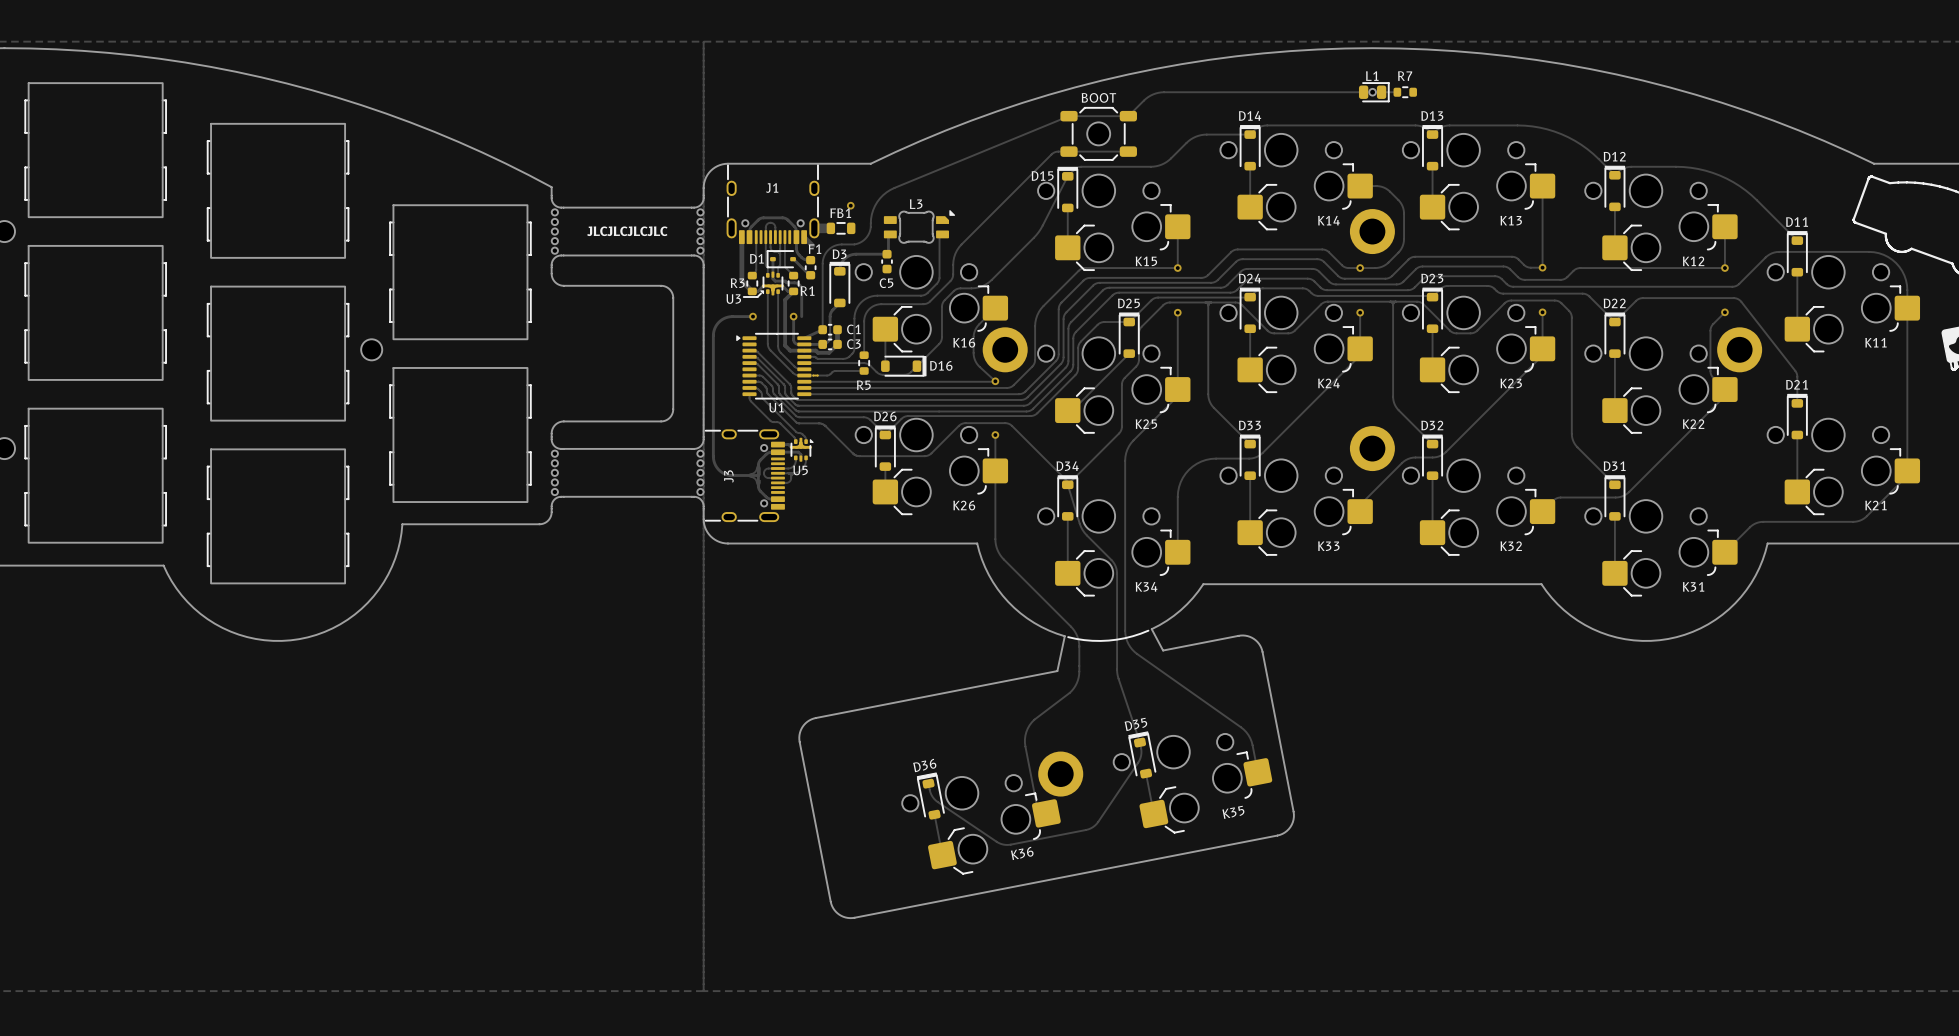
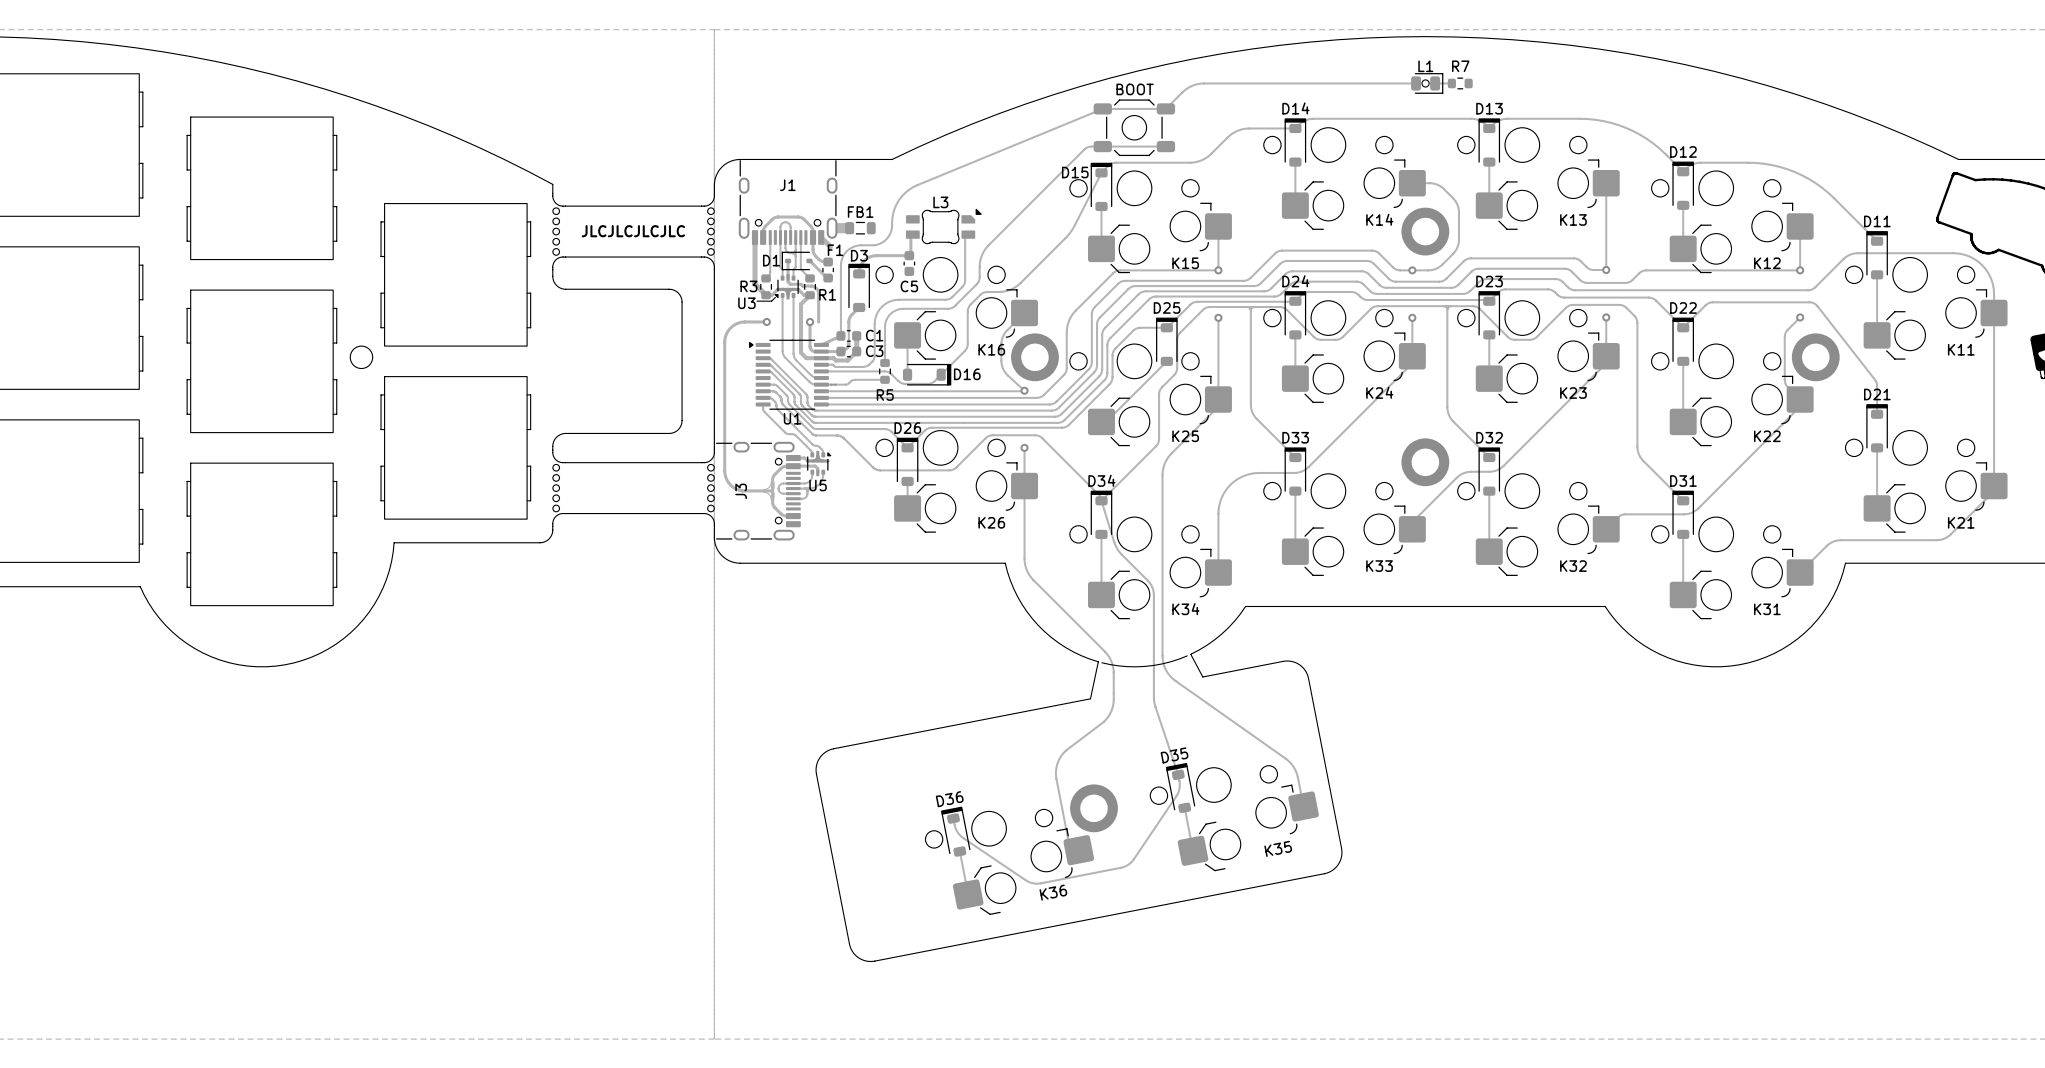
via: (850, 205) -> none

